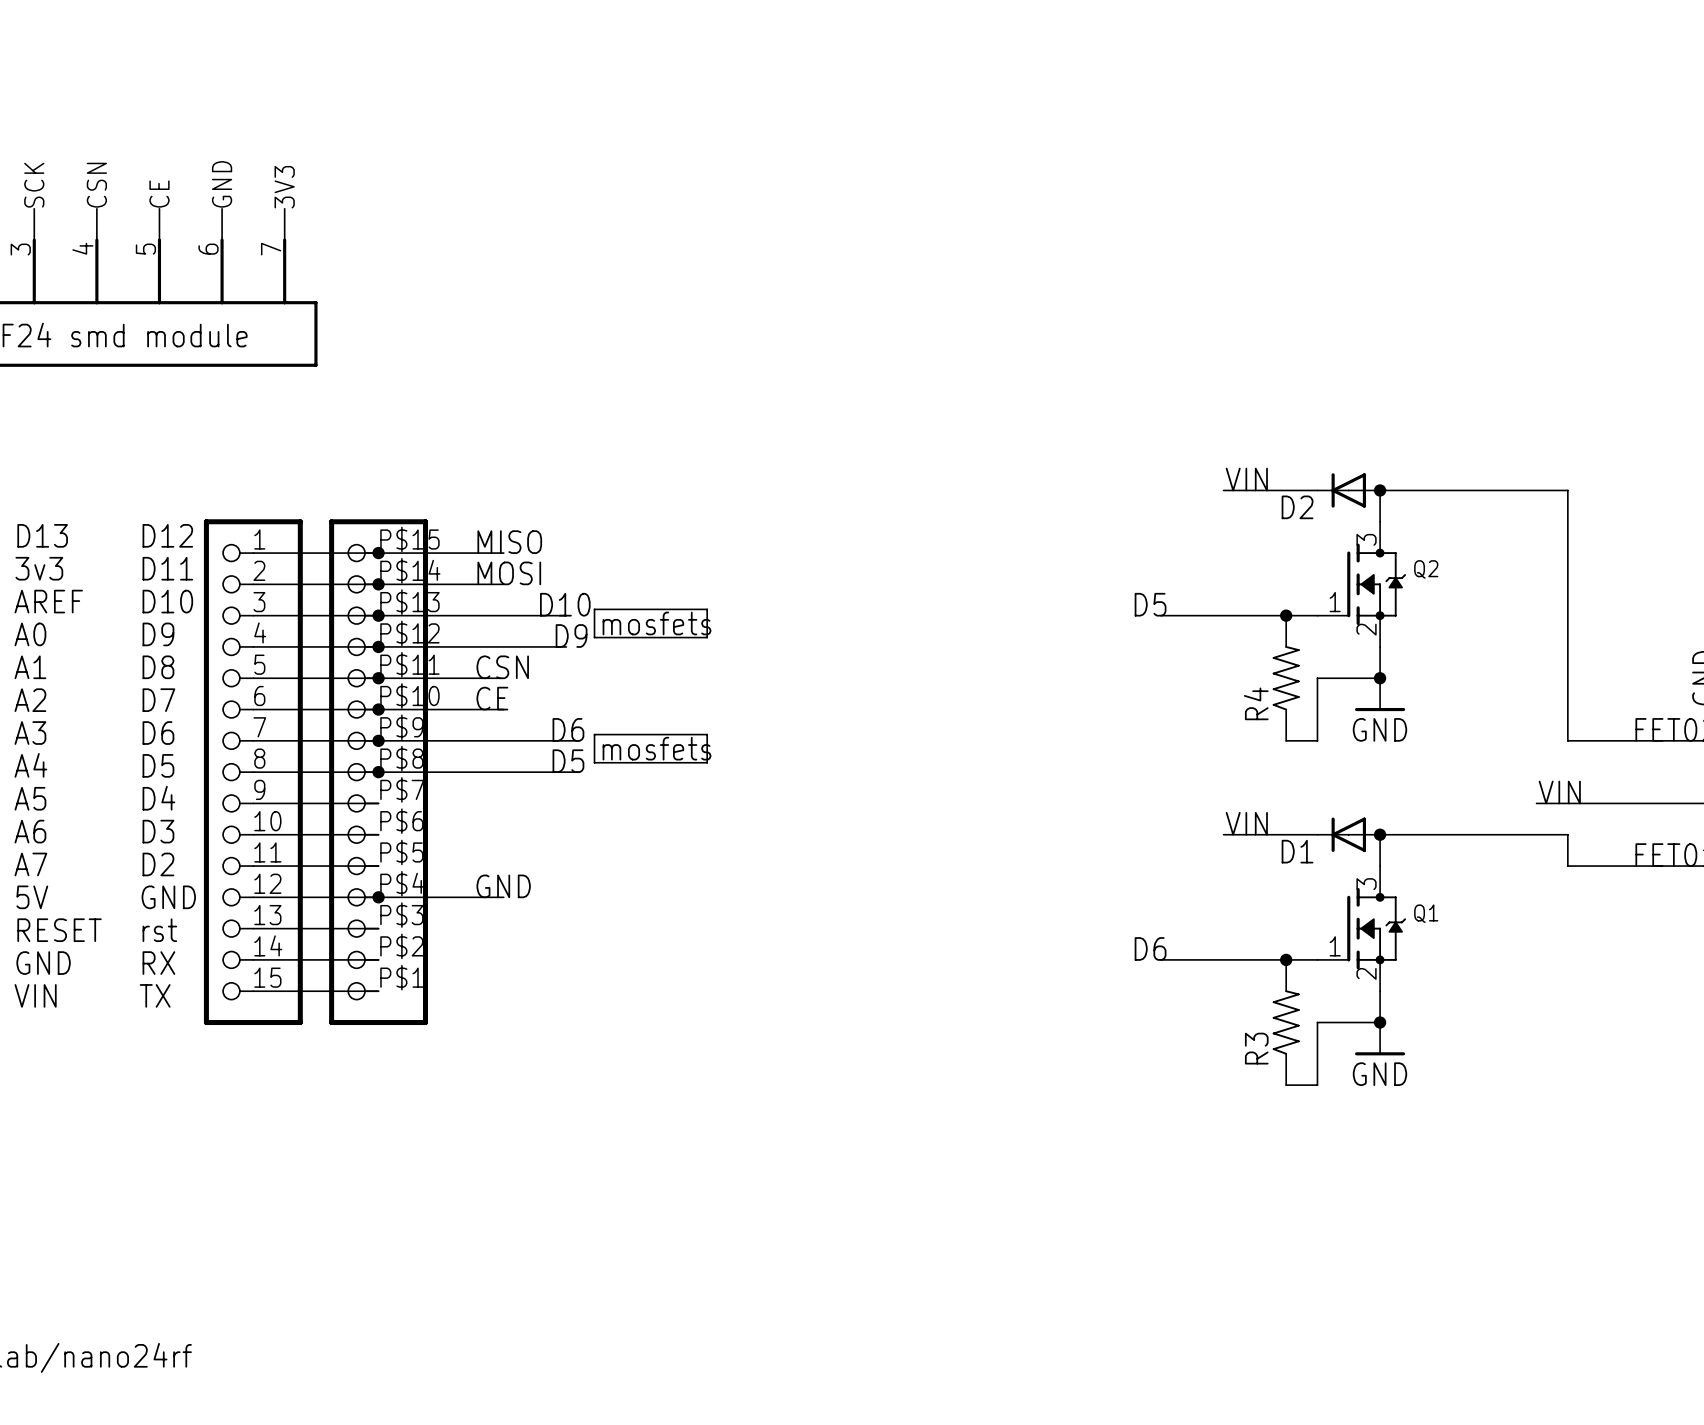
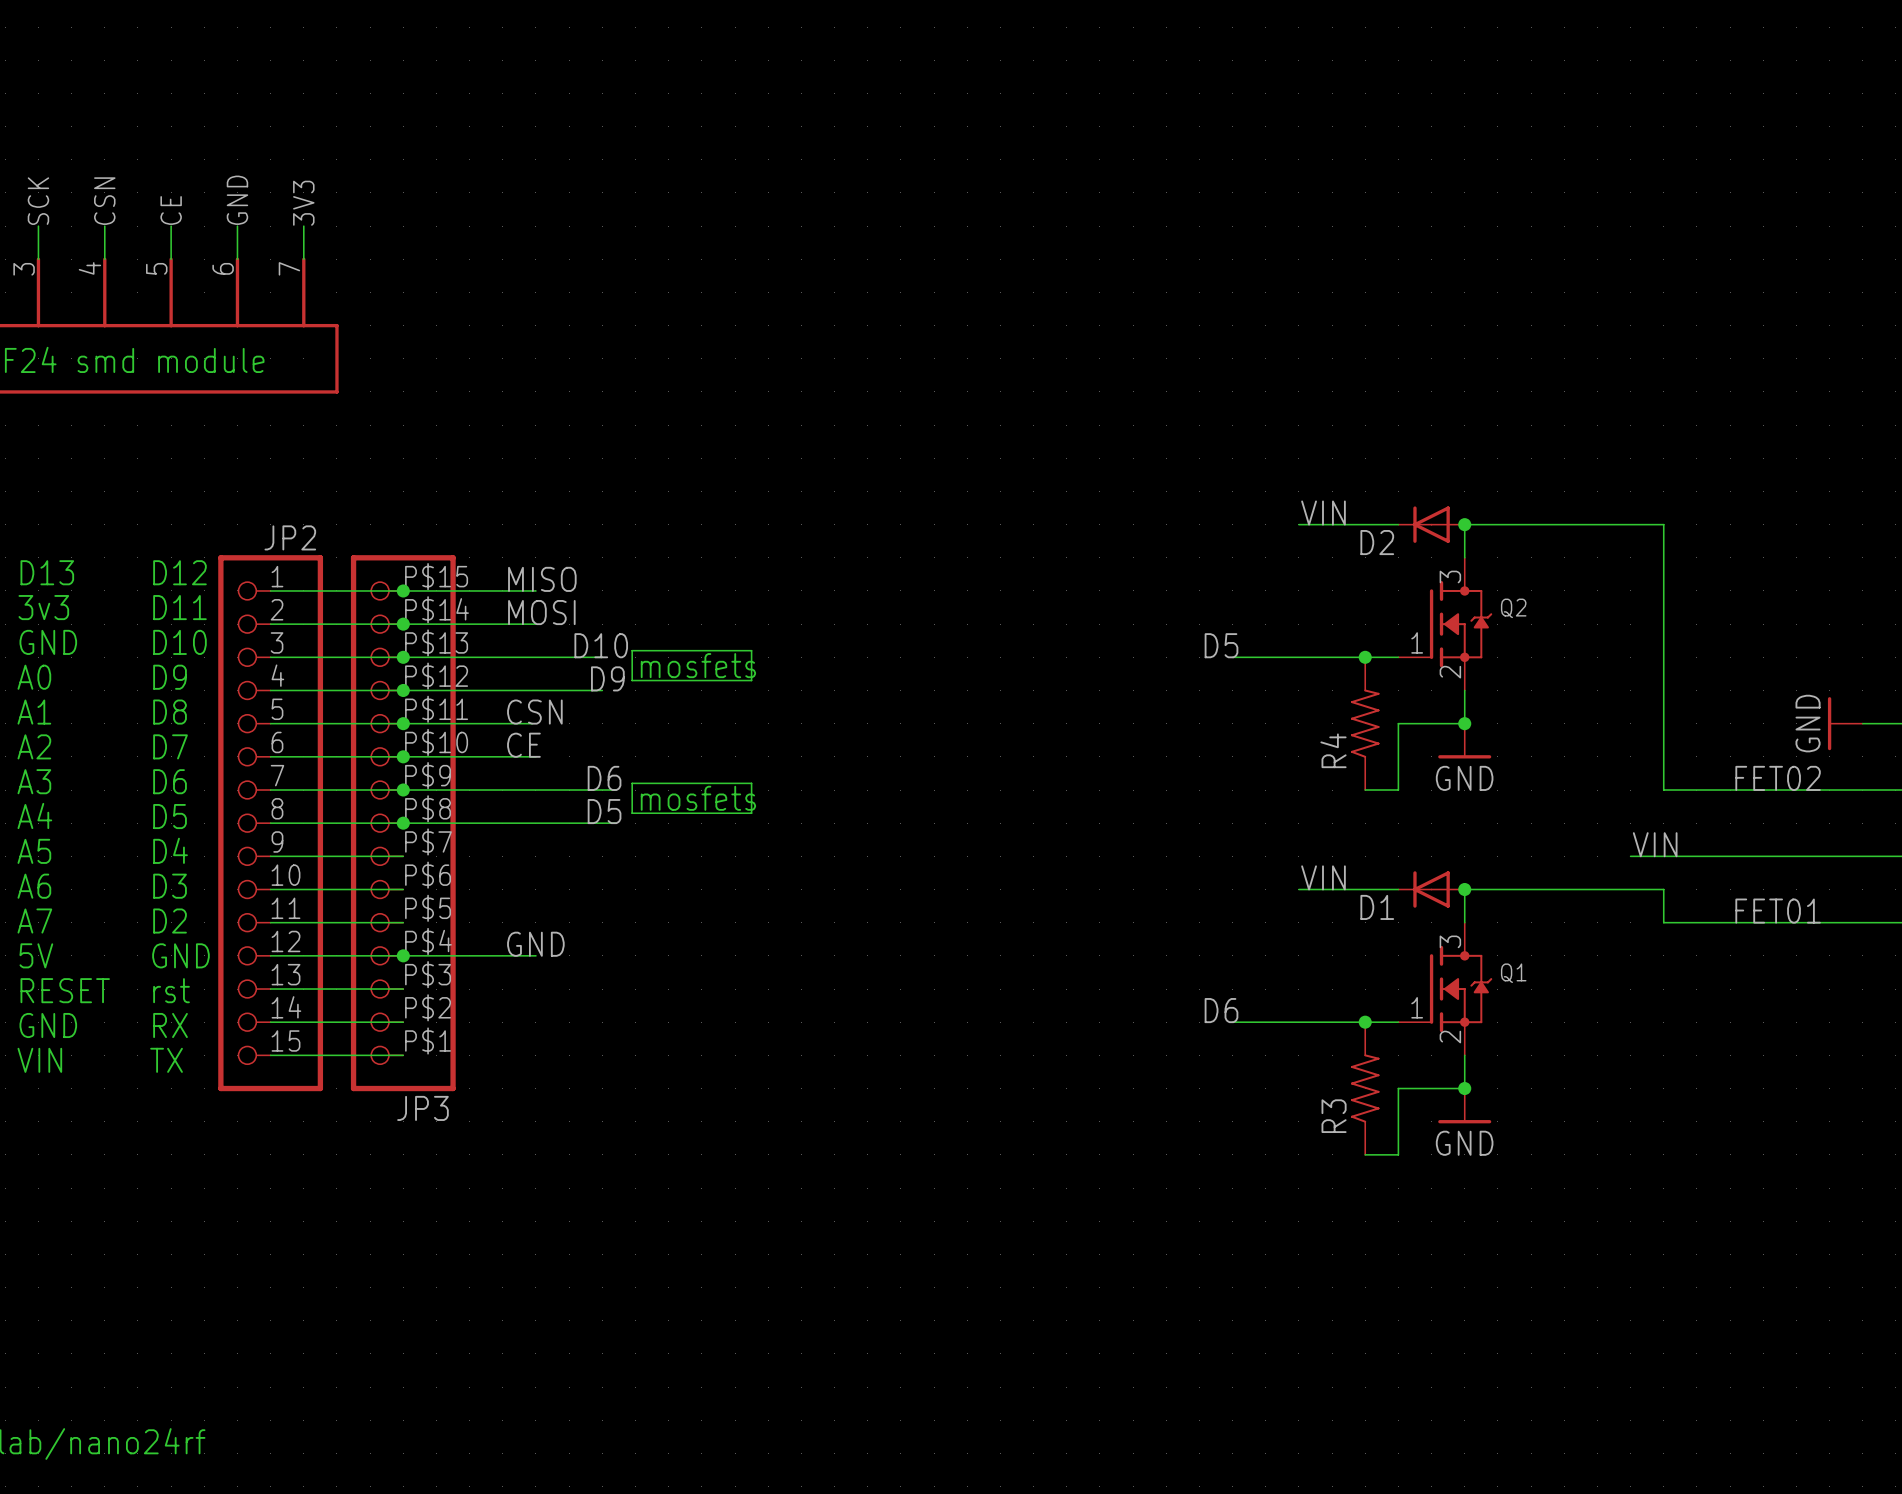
JP2 name: none -> JP2 (290, 537)
text: AREF (48, 601) -> GND (48, 642)
JP3 name: none -> JP3 (422, 1108)

